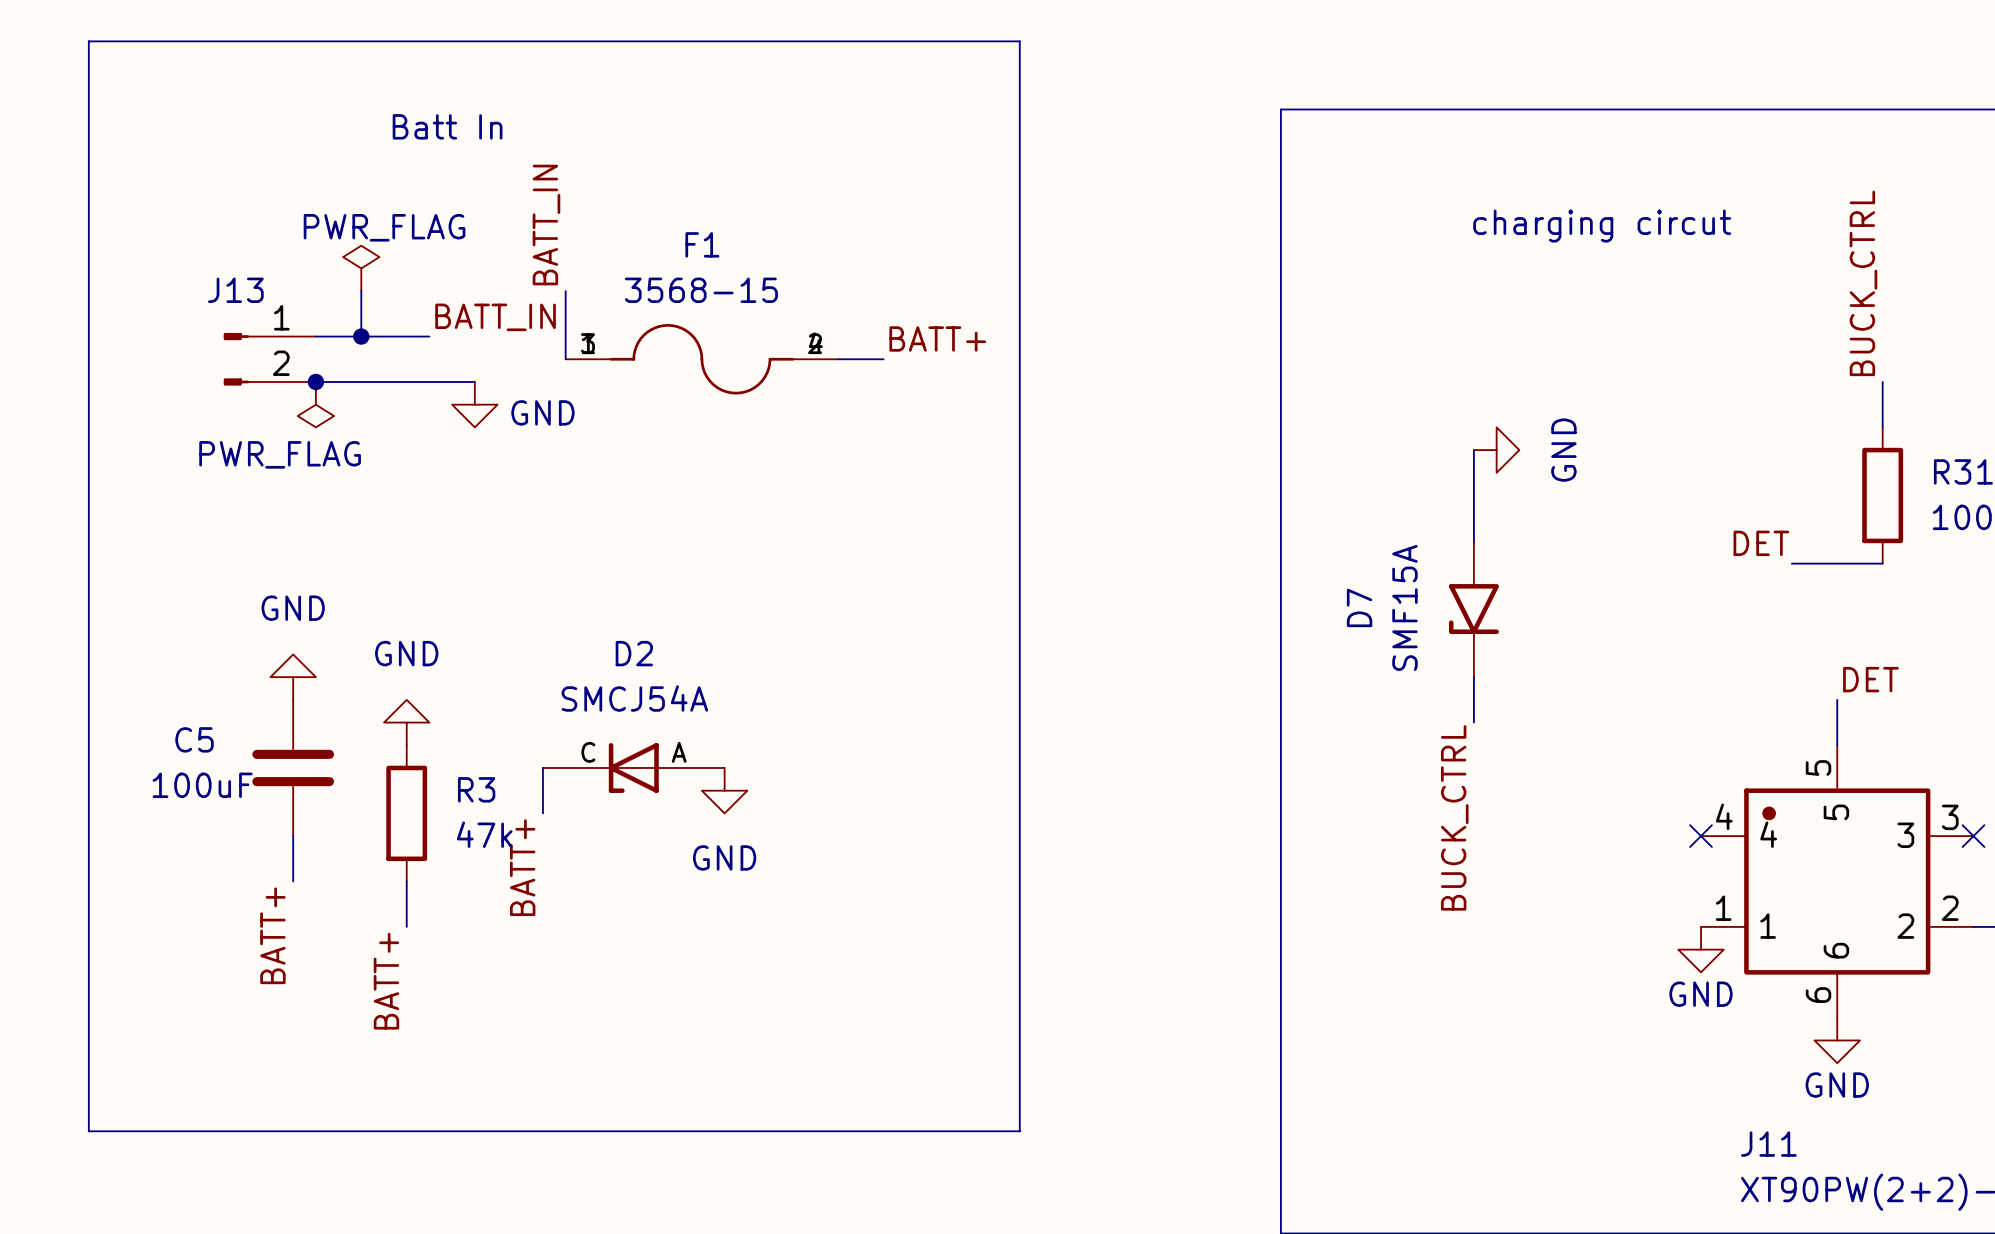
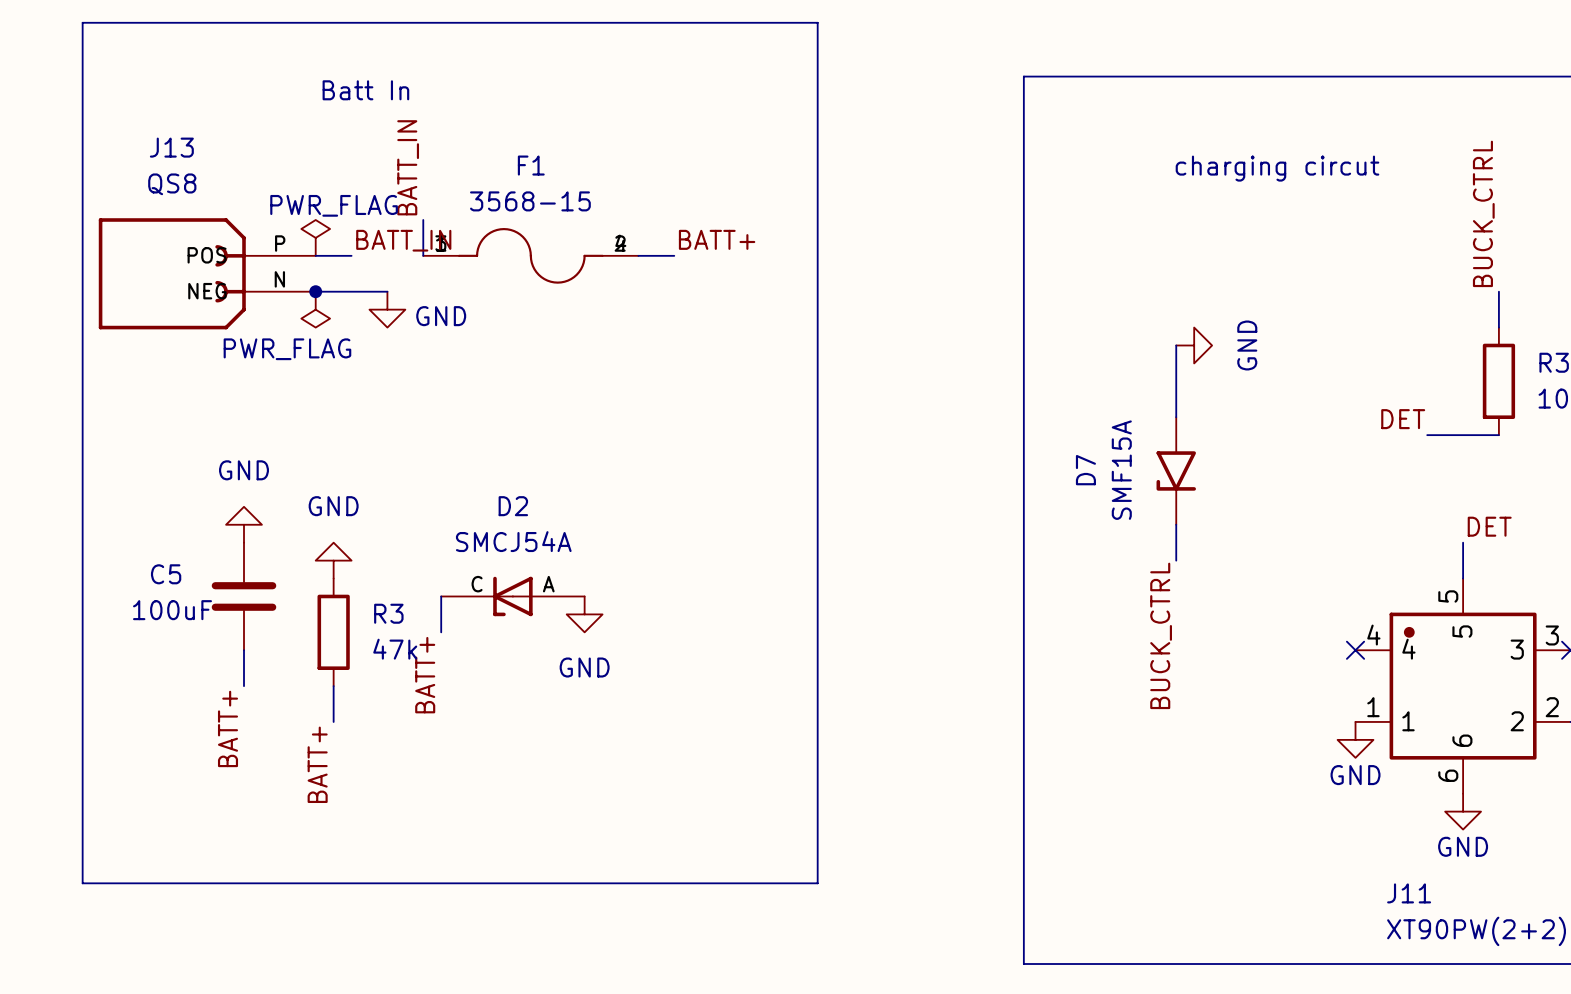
label position: BATT_IN (546, 225) -> BATT_IN (408, 167)
J13 value: none -> QS8 (172, 184)
power symbol position: PWR_FLAG (361, 268) -> PWR_FLAG (315, 237)
J13 name position: J13 (235, 290) -> J13 (171, 147)
wire: (361, 291) (361, 336) -> (423, 219) (423, 255)
wire: (565, 291) (565, 359) -> none
J13 symbol: [223, 332, 316, 386] -> [98, 218, 316, 330]
junction: (361, 336) -> none
label position: BATT+ (937, 339) -> BATT+ (717, 239)
F1 position: (701, 359) -> (530, 255)
wire: (838, 359) (883, 359) -> (638, 255) (674, 255)
junction: (315, 381) -> none
junction: none -> (315, 291)
power symbol: PWR_FLAG (315, 404) -> none
power symbol: none -> PWR_FLAG (315, 309)

